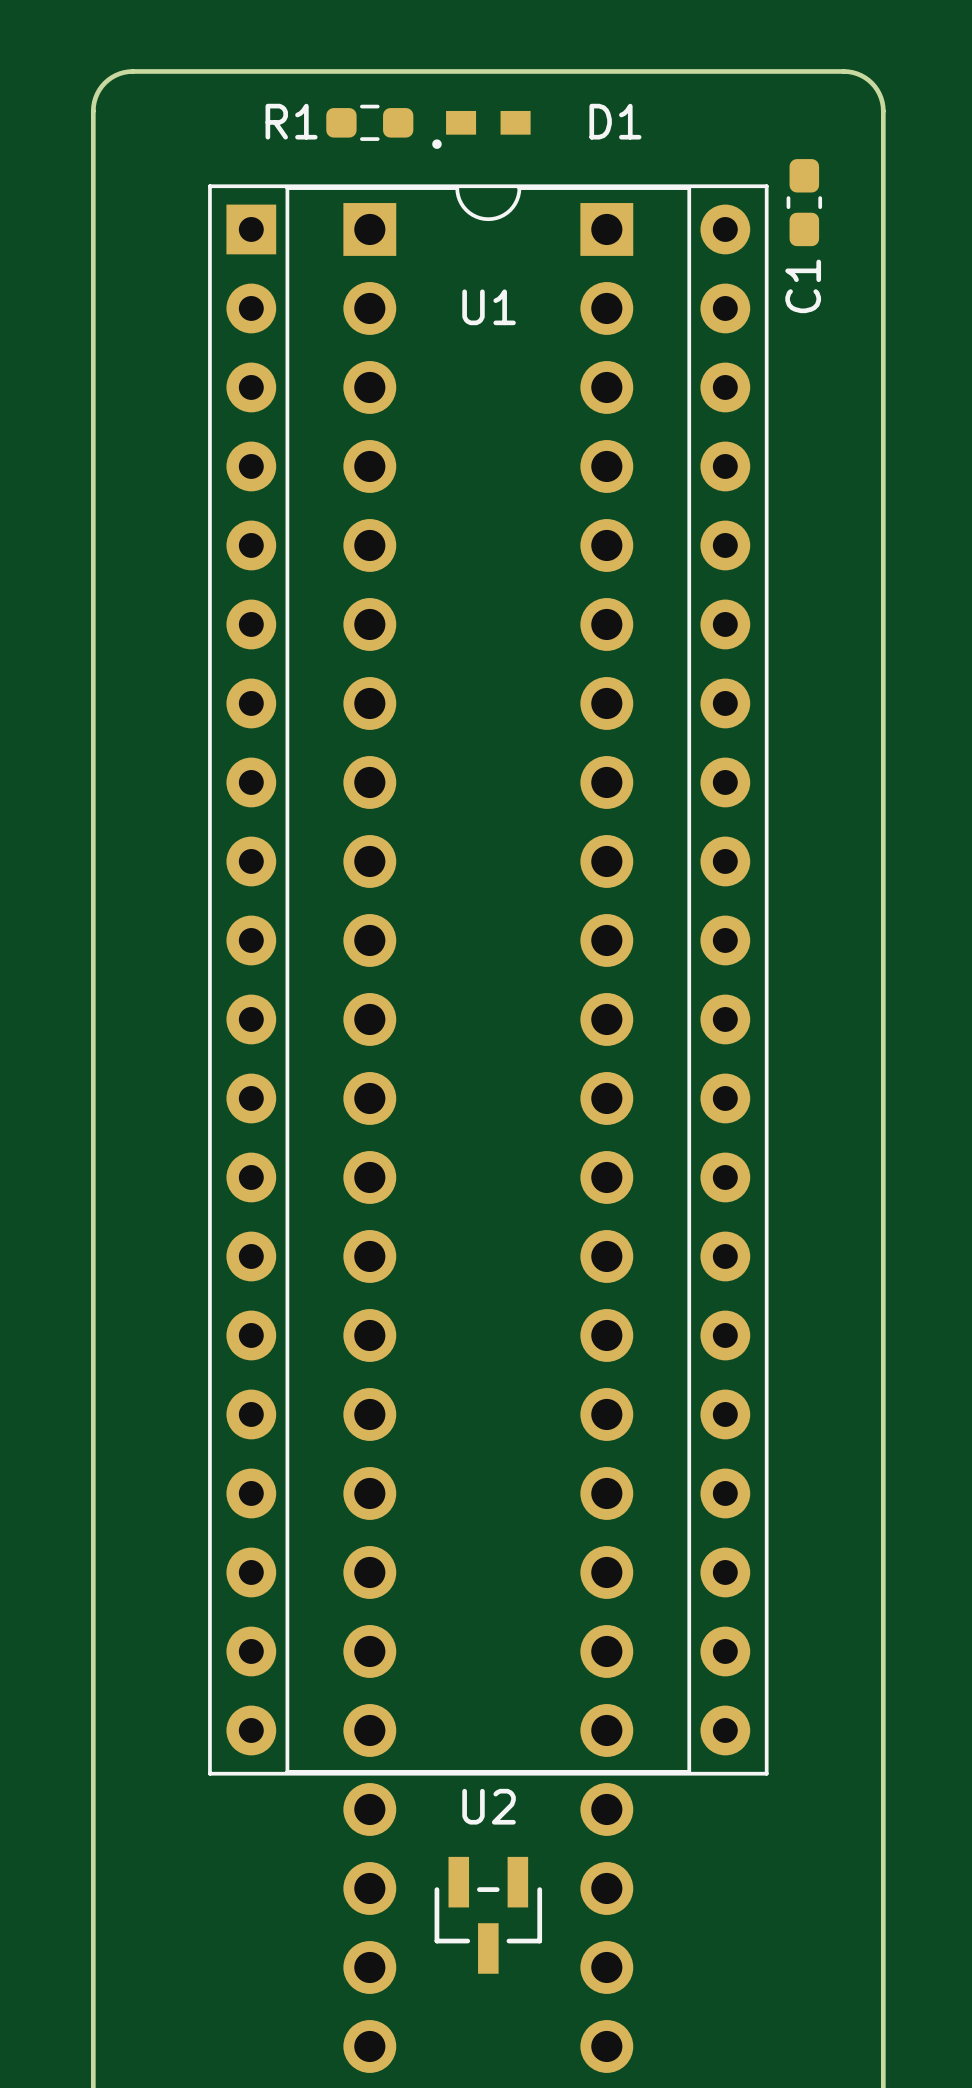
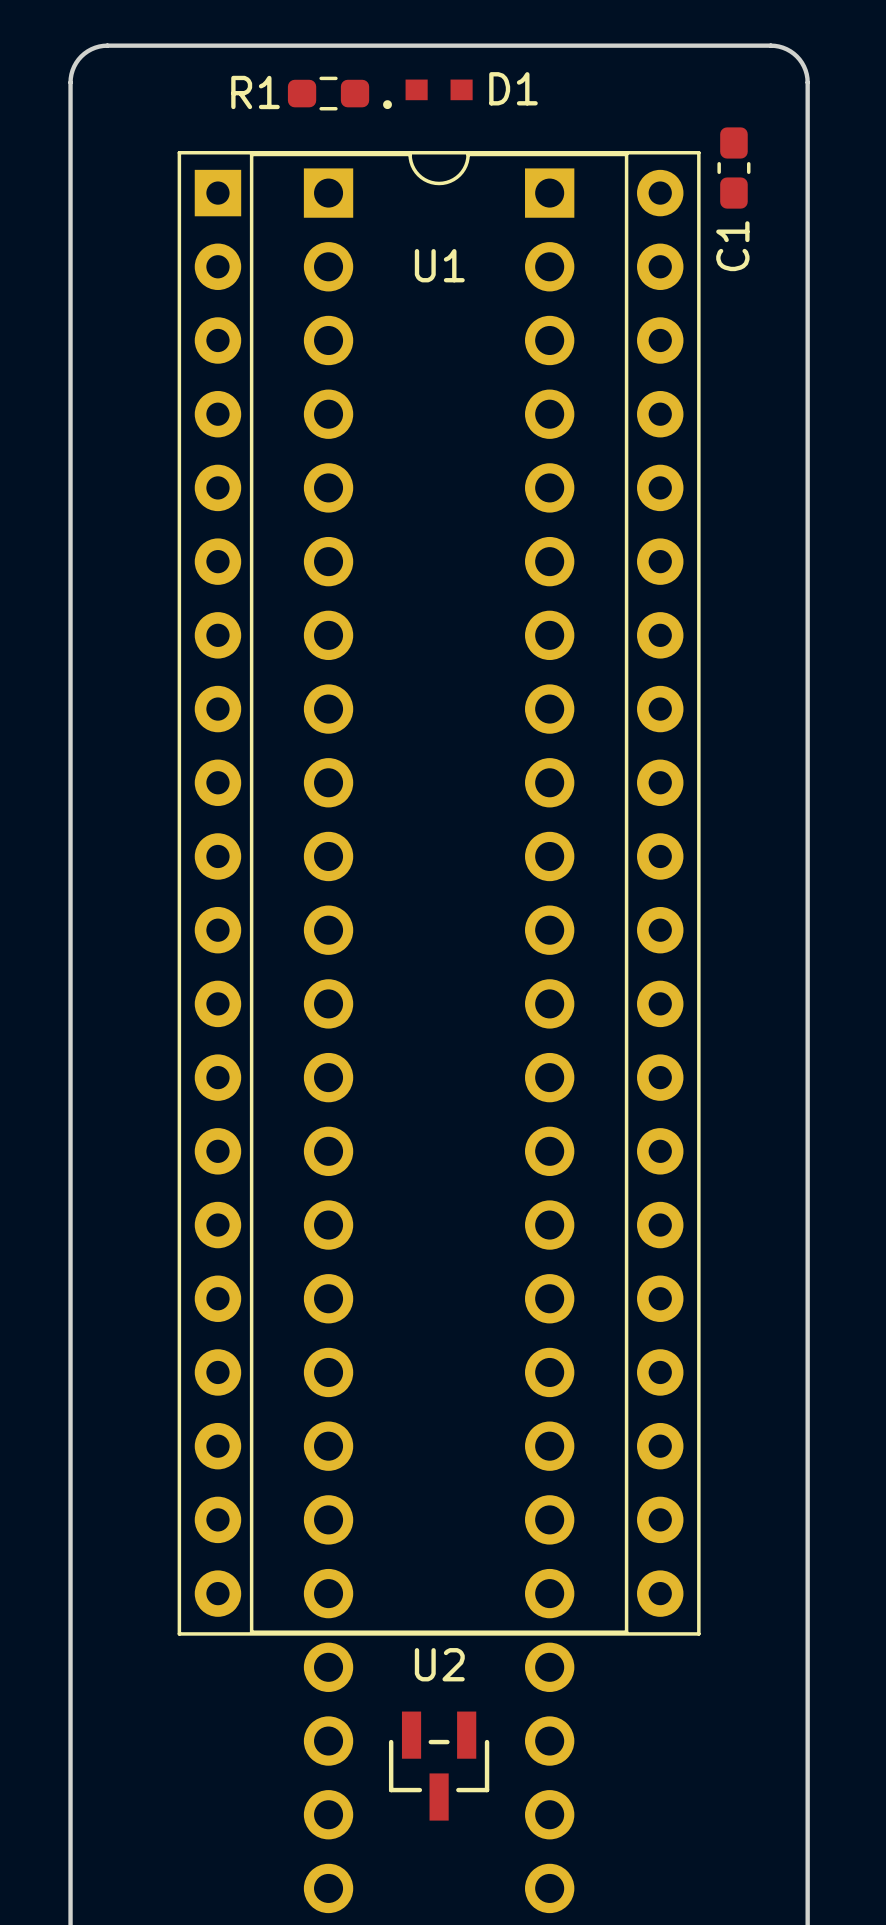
D1 footprint: [432, 110, 531, 149] -> [383, 79, 473, 110]
D1 name position: D1 (615, 121) -> D1 (513, 88)

